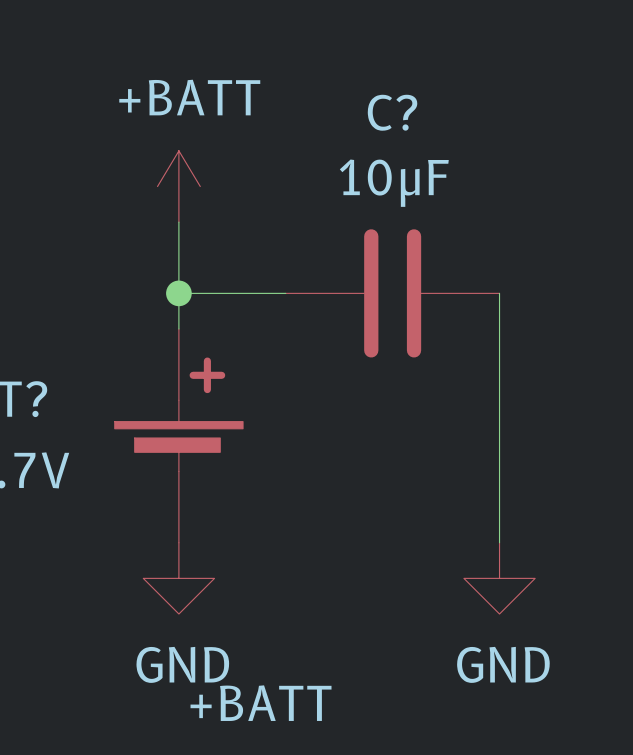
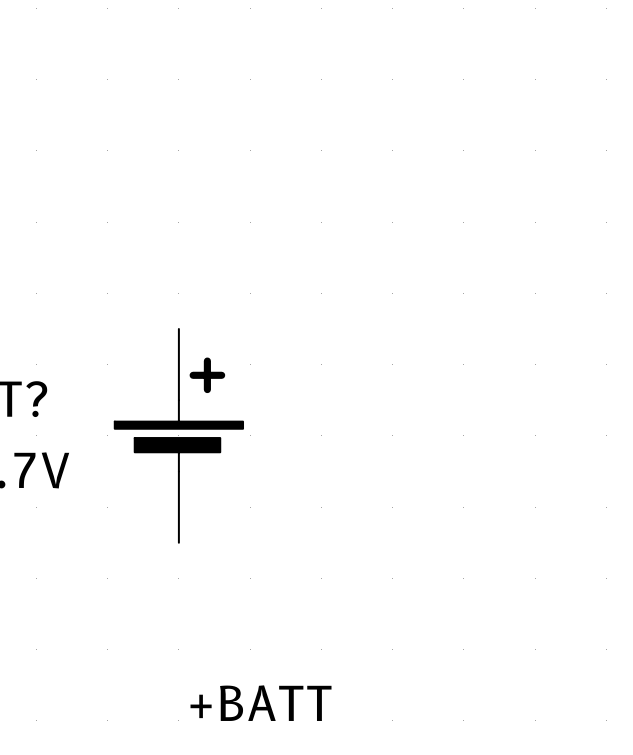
power symbol: +BATT (178, 186) -> none
wire: (178, 222) (178, 329) -> none
wire: (178, 293) (285, 293) -> none
junction: (178, 293) -> none
C?: 10μF (392, 293) -> none
wire: (499, 293) (499, 542) -> none
power symbol: GND (178, 578) -> none
power symbol: GND (499, 578) -> none

